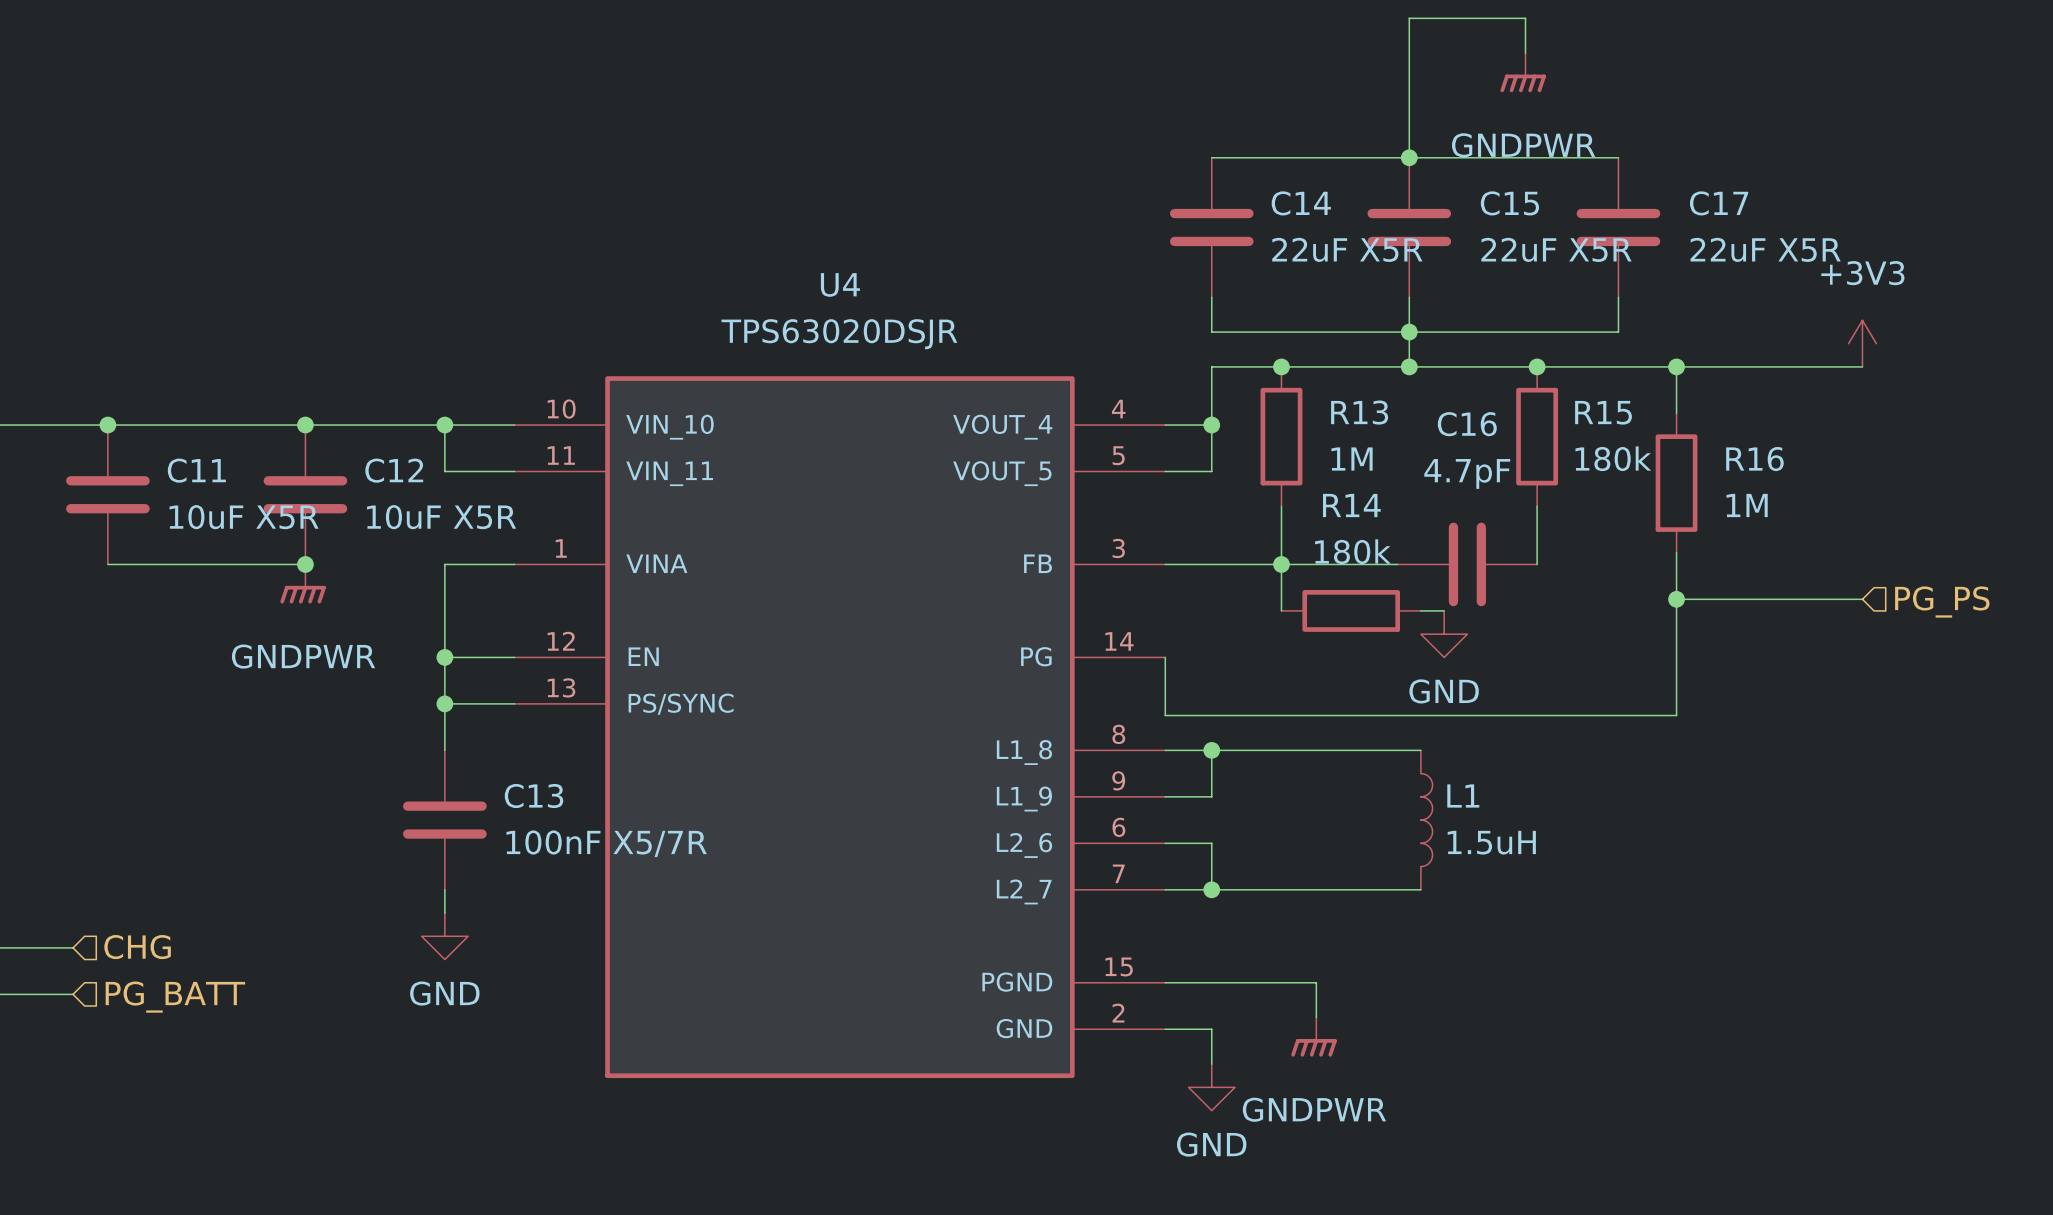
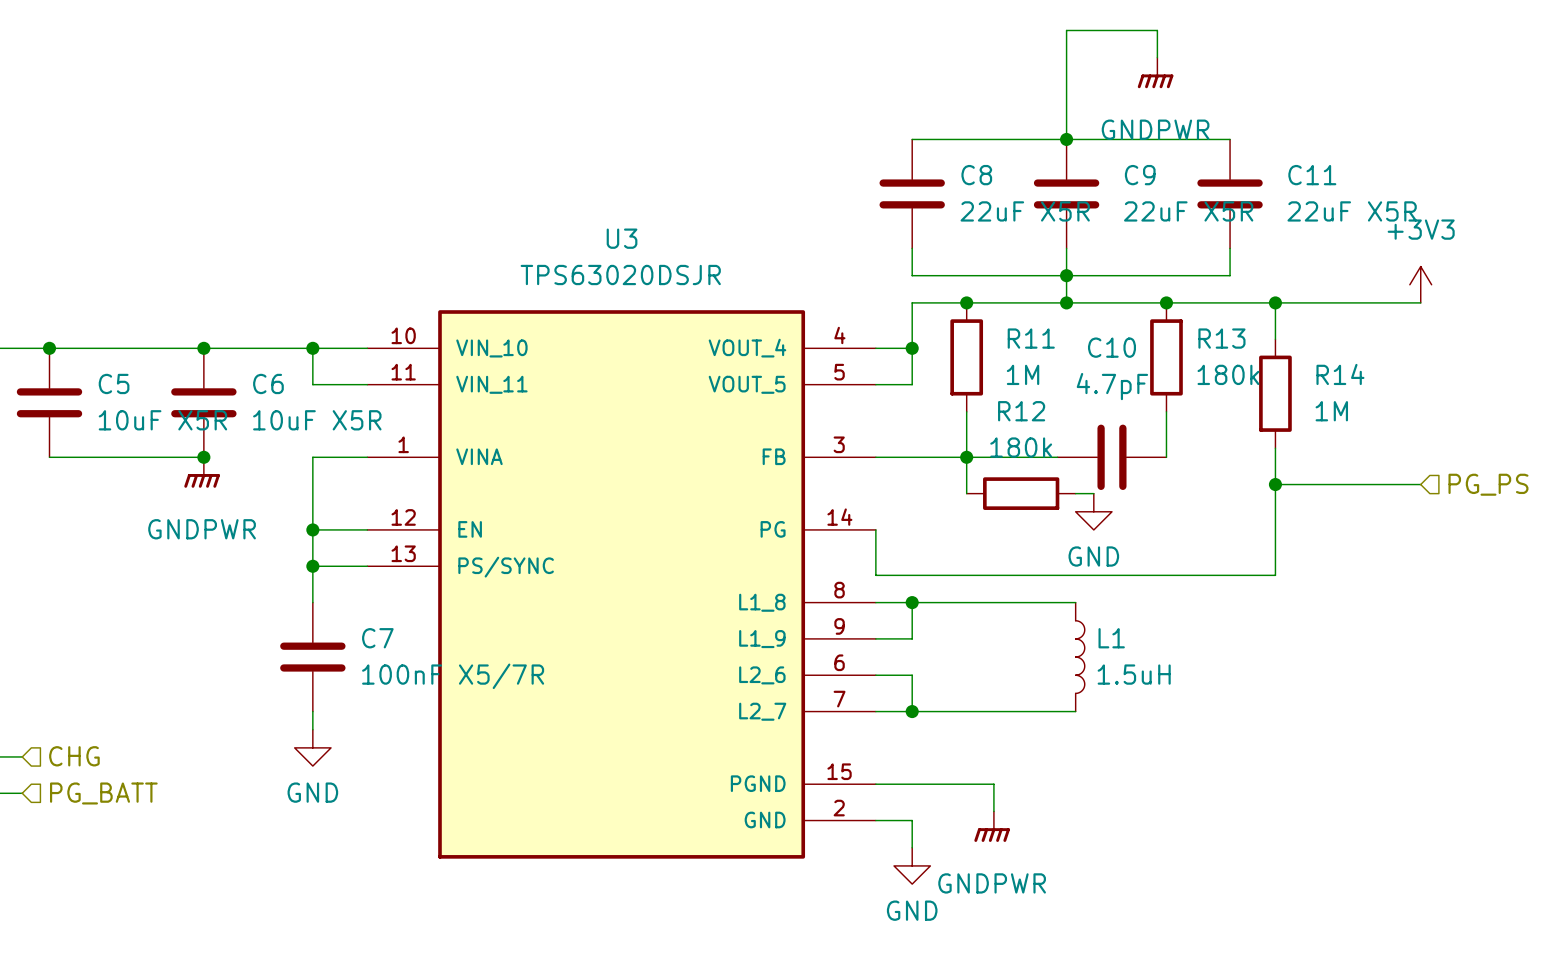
C14 name: C14 (1301, 203) -> C8 (976, 175)
C15 name: C15 (1509, 203) -> C9 (1140, 175)
C17 name: C17 (1719, 203) -> C11 (1312, 175)
U4 name: U4 (840, 284) -> U3 (622, 238)
R13 name: R13 (1359, 412) -> R11 (1031, 338)
R15 name: R15 (1603, 412) -> R13 (1221, 338)
C16 name: C16 (1467, 424) -> C10 (1111, 347)
R16 name: R16 (1754, 459) -> R14 (1340, 374)
C11 name: C11 (196, 470) -> C5 (114, 383)
C12 name: C12 (394, 470) -> C6 (268, 383)
R14 name: R14 (1351, 505) -> R12 (1021, 411)
C13 name: C13 (533, 796) -> C7 (377, 638)

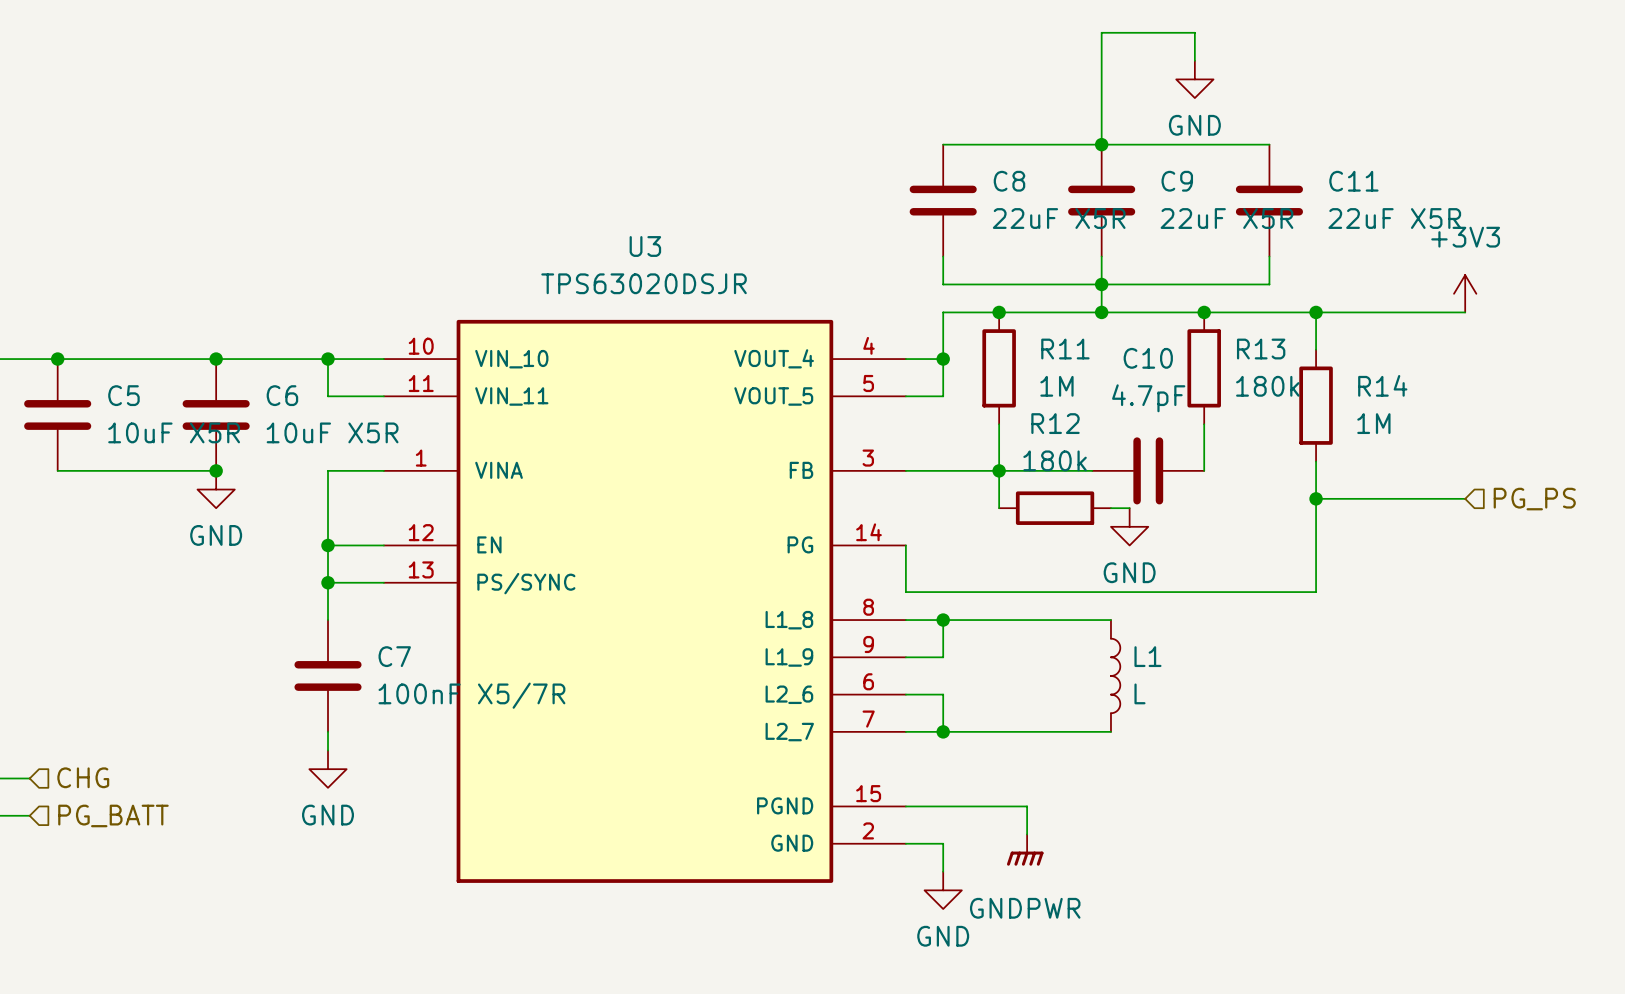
power symbol: GNDPWR (1155, 72) -> GND (1194, 79)
power symbol: GNDPWR (202, 472) -> GND (216, 489)
L1 value: 1.5uH (1134, 674) -> L (1139, 693)

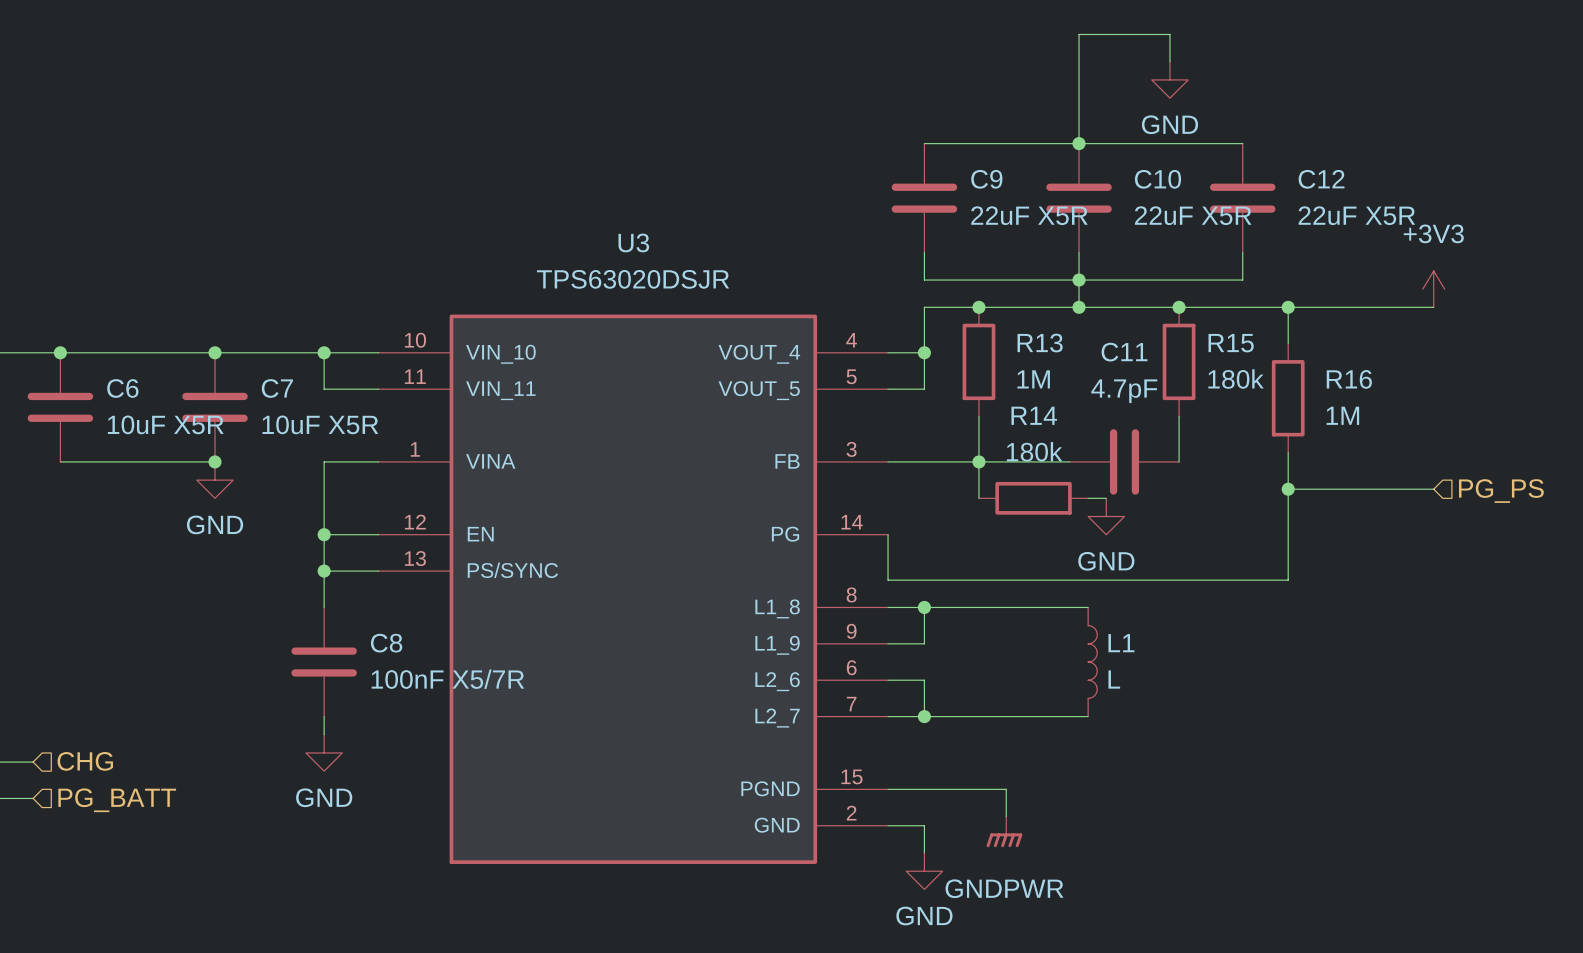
C8 name: C8 (1009, 181) -> C9 (986, 179)
C9 name: C9 (1177, 181) -> C10 (1158, 179)
C11 name: C11 (1353, 181) -> C12 (1321, 179)
R11 name: R11 (1065, 349) -> R13 (1040, 343)
R13 name: R13 (1261, 349) -> R15 (1231, 343)
C10 name: C10 (1148, 358) -> C11 (1124, 352)
R14 name: R14 (1382, 385) -> R16 (1349, 379)
C5 name: C5 (123, 395) -> C6 (122, 388)
C6 name: C6 (282, 395) -> C7 (277, 388)
R12 name: R12 (1055, 423) -> R14 (1034, 415)
C7 name: C7 (394, 656) -> C8 (386, 643)

